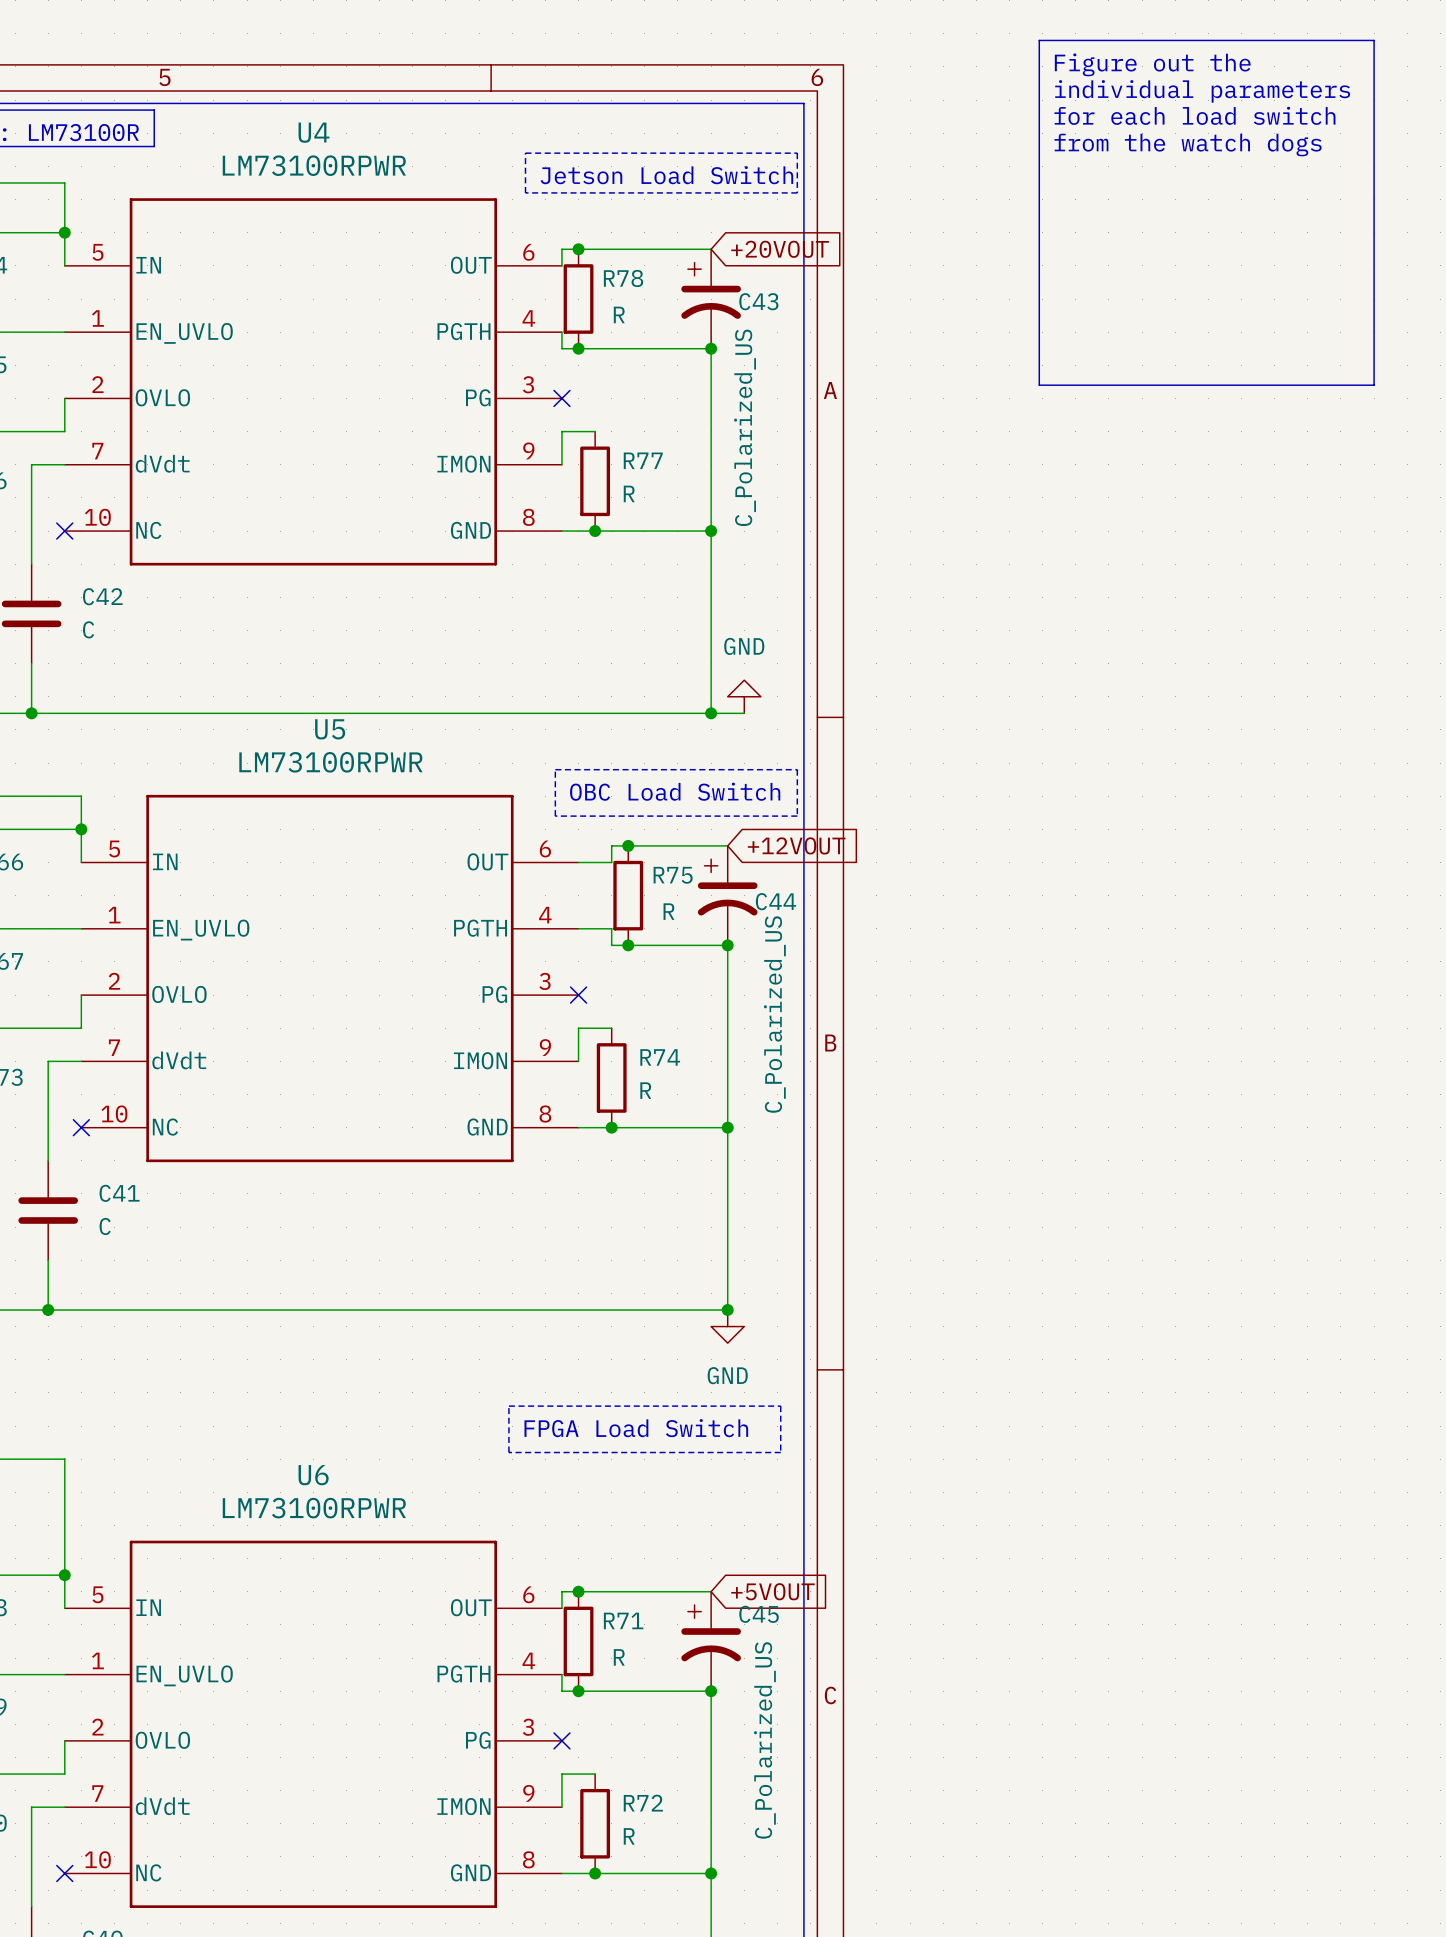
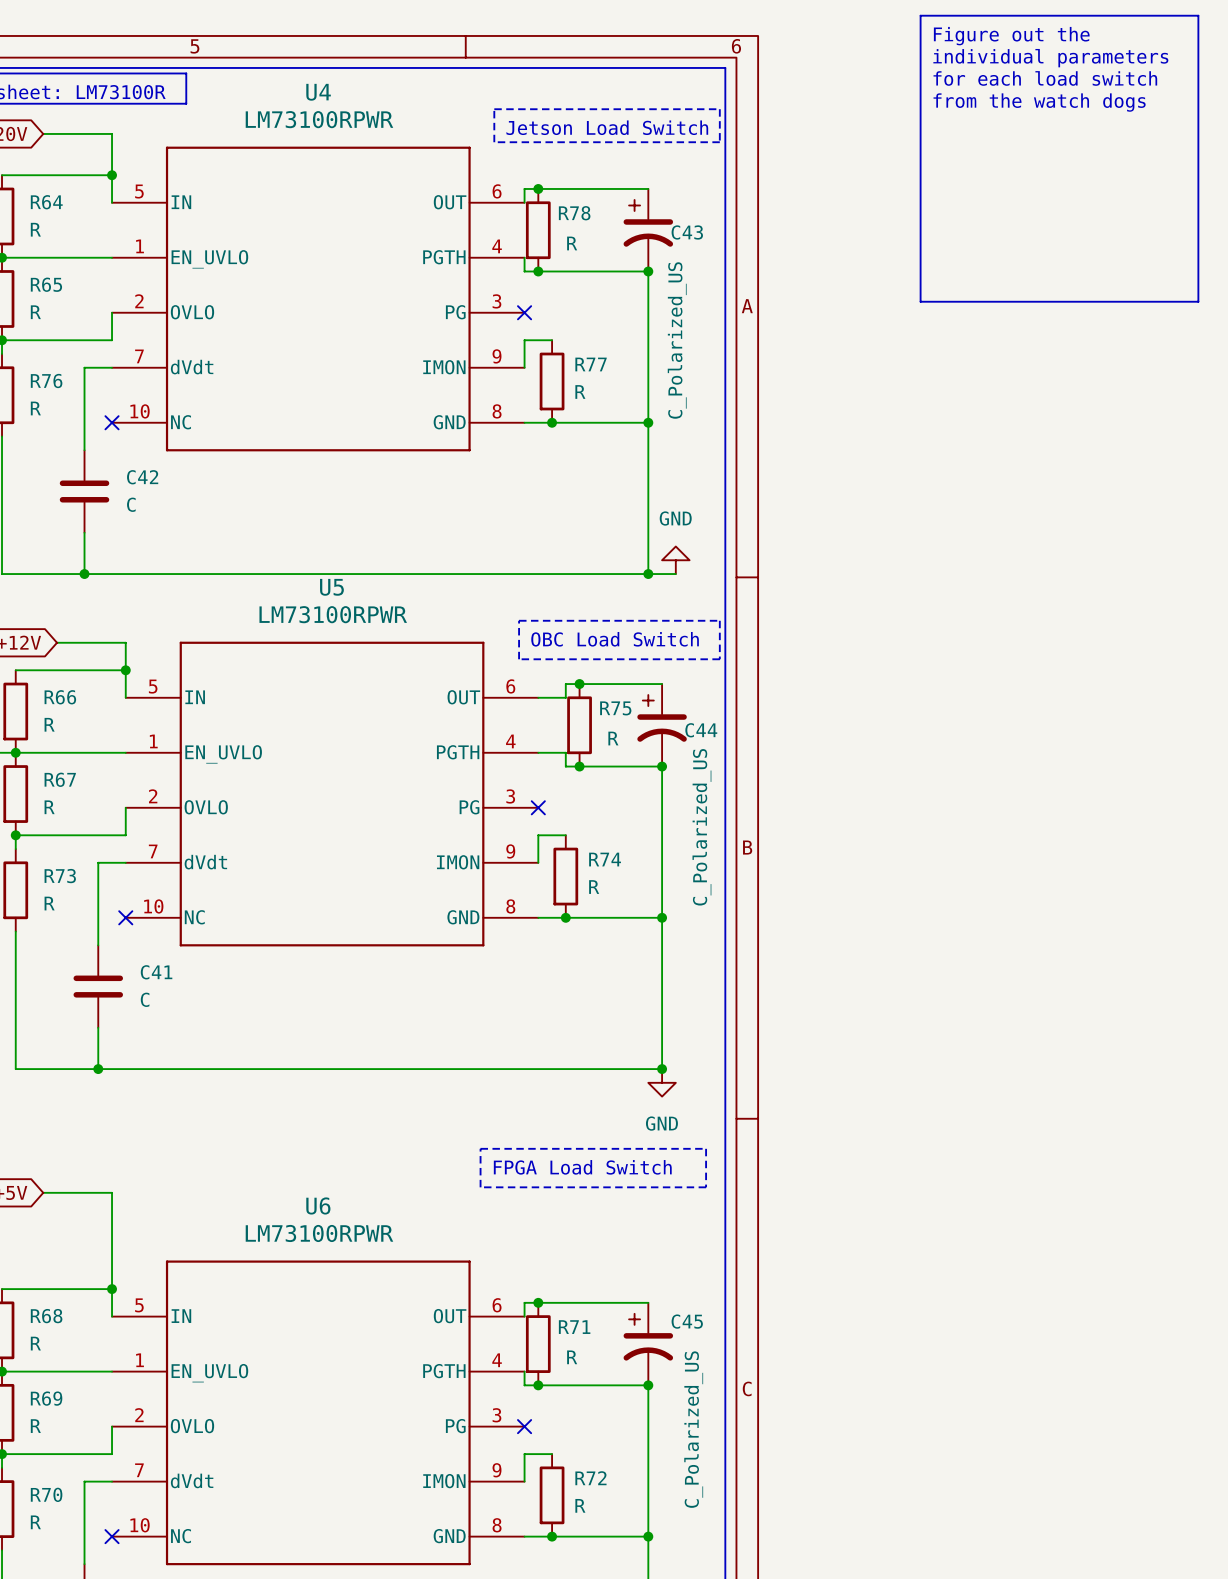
global label: +20VOUT (780, 249) -> none
global label: +12VOUT (796, 845) -> none
global label: +5VOUT (772, 1591) -> none

